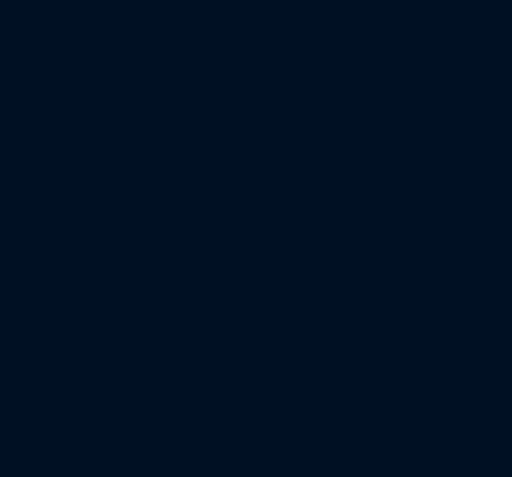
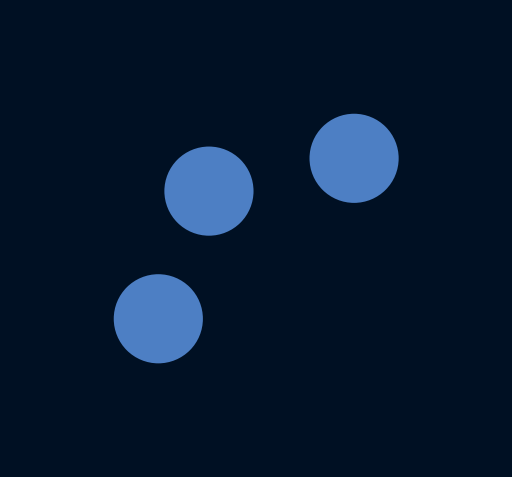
part: none -> (354, 158)
part: none -> (208, 191)
part: none -> (158, 318)

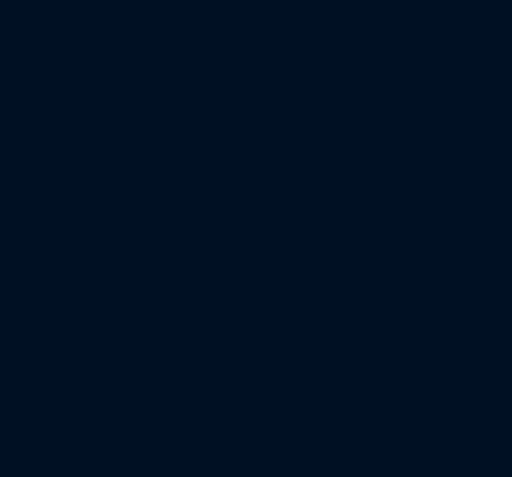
part: (354, 158) -> none
part: (208, 191) -> none
part: (158, 318) -> none

